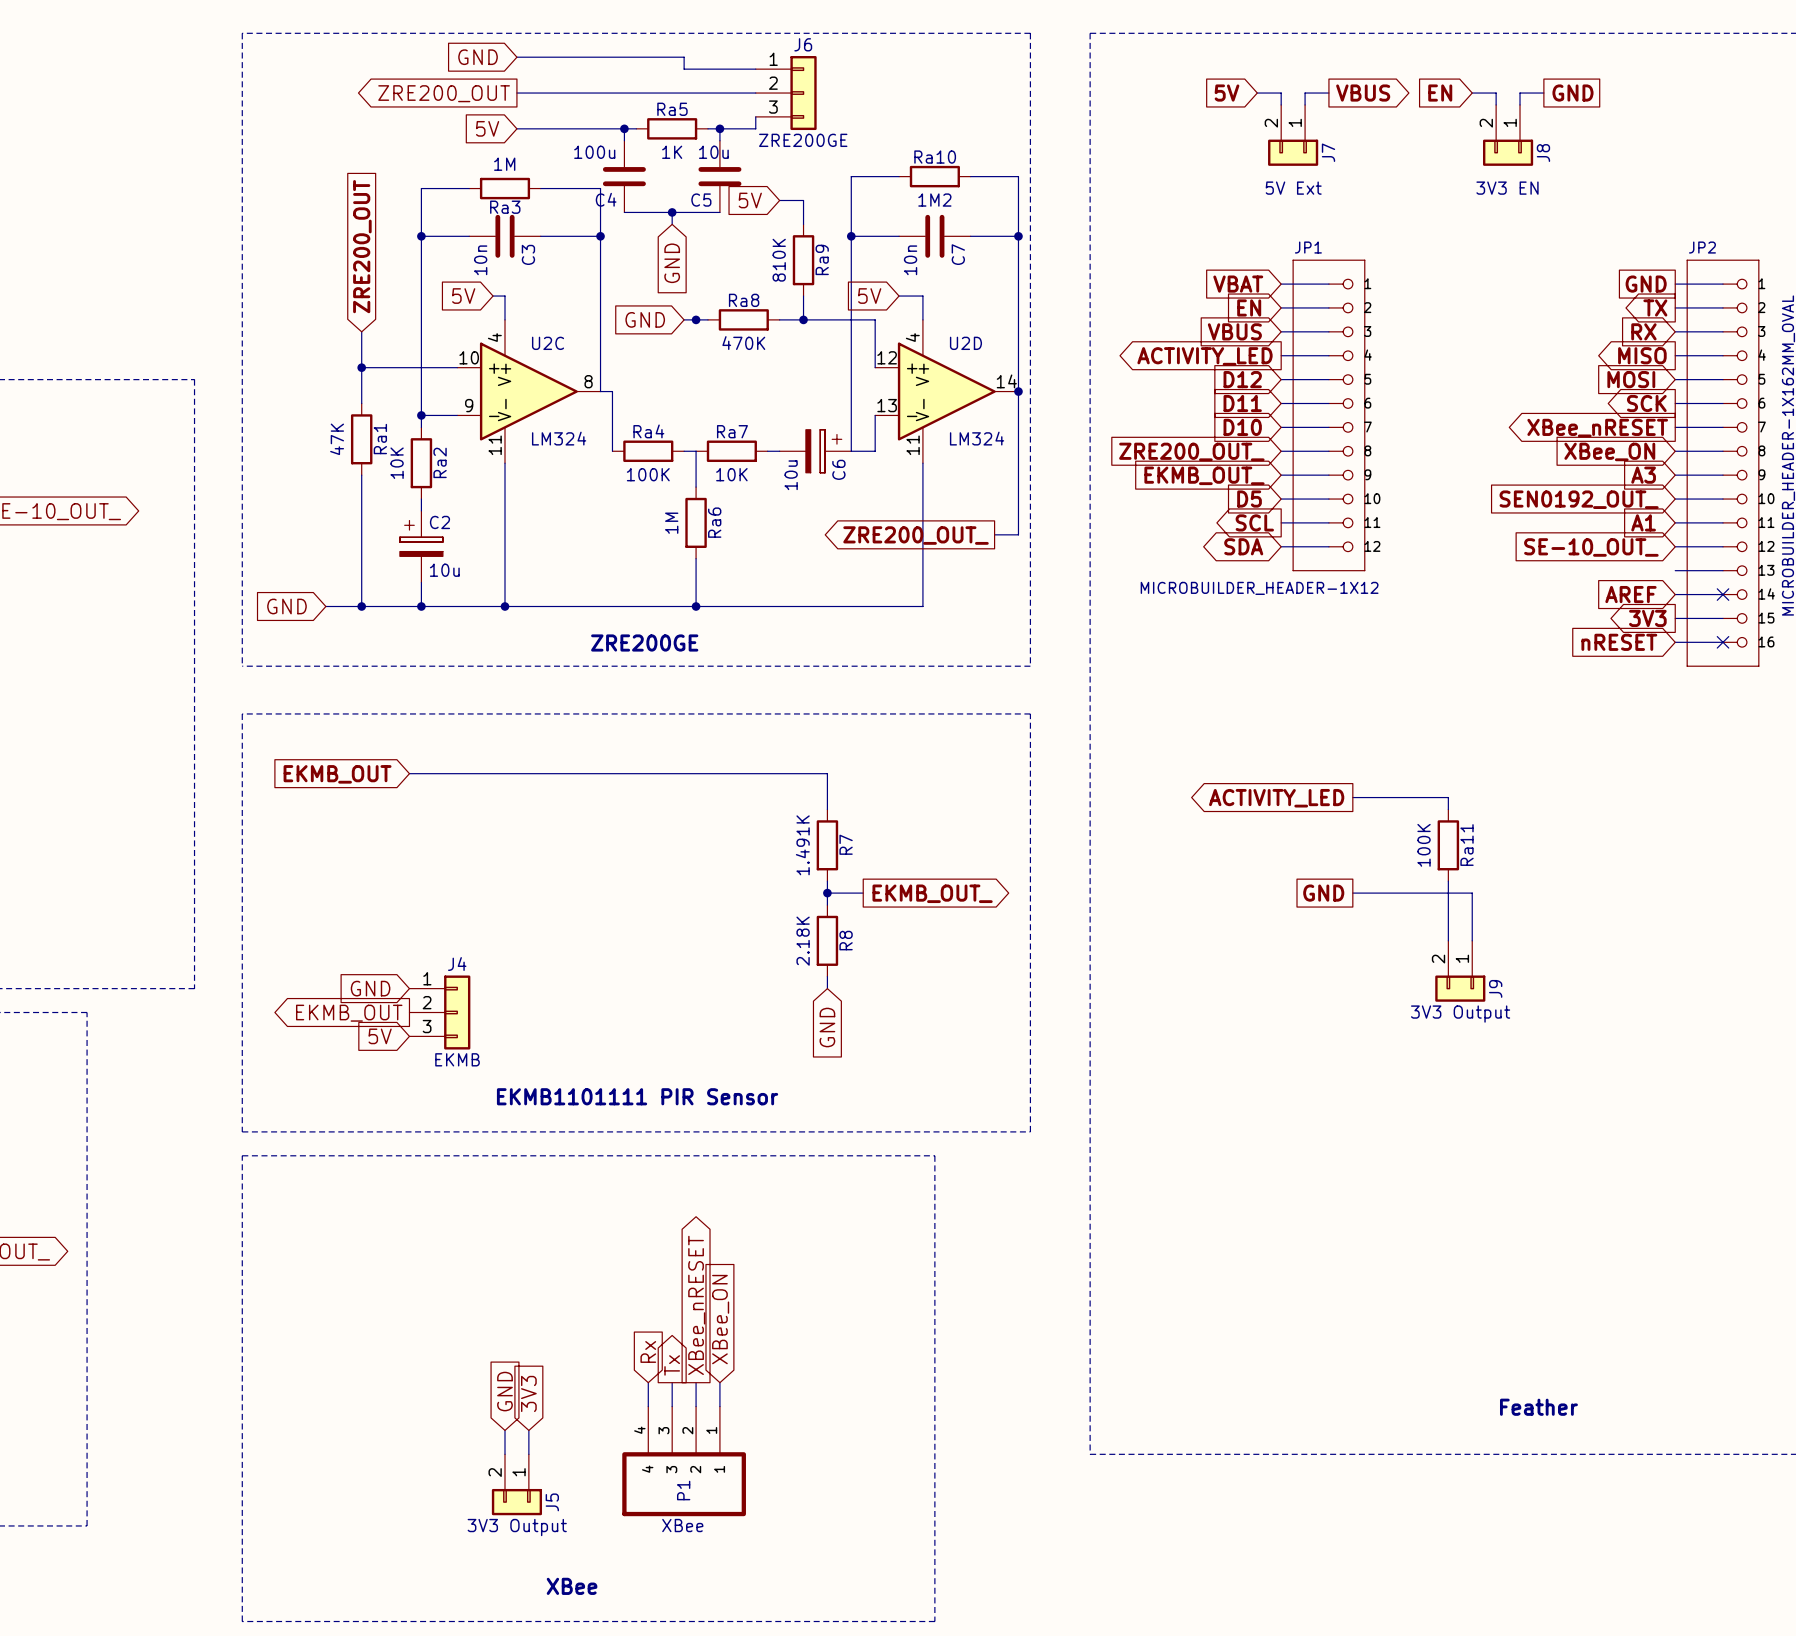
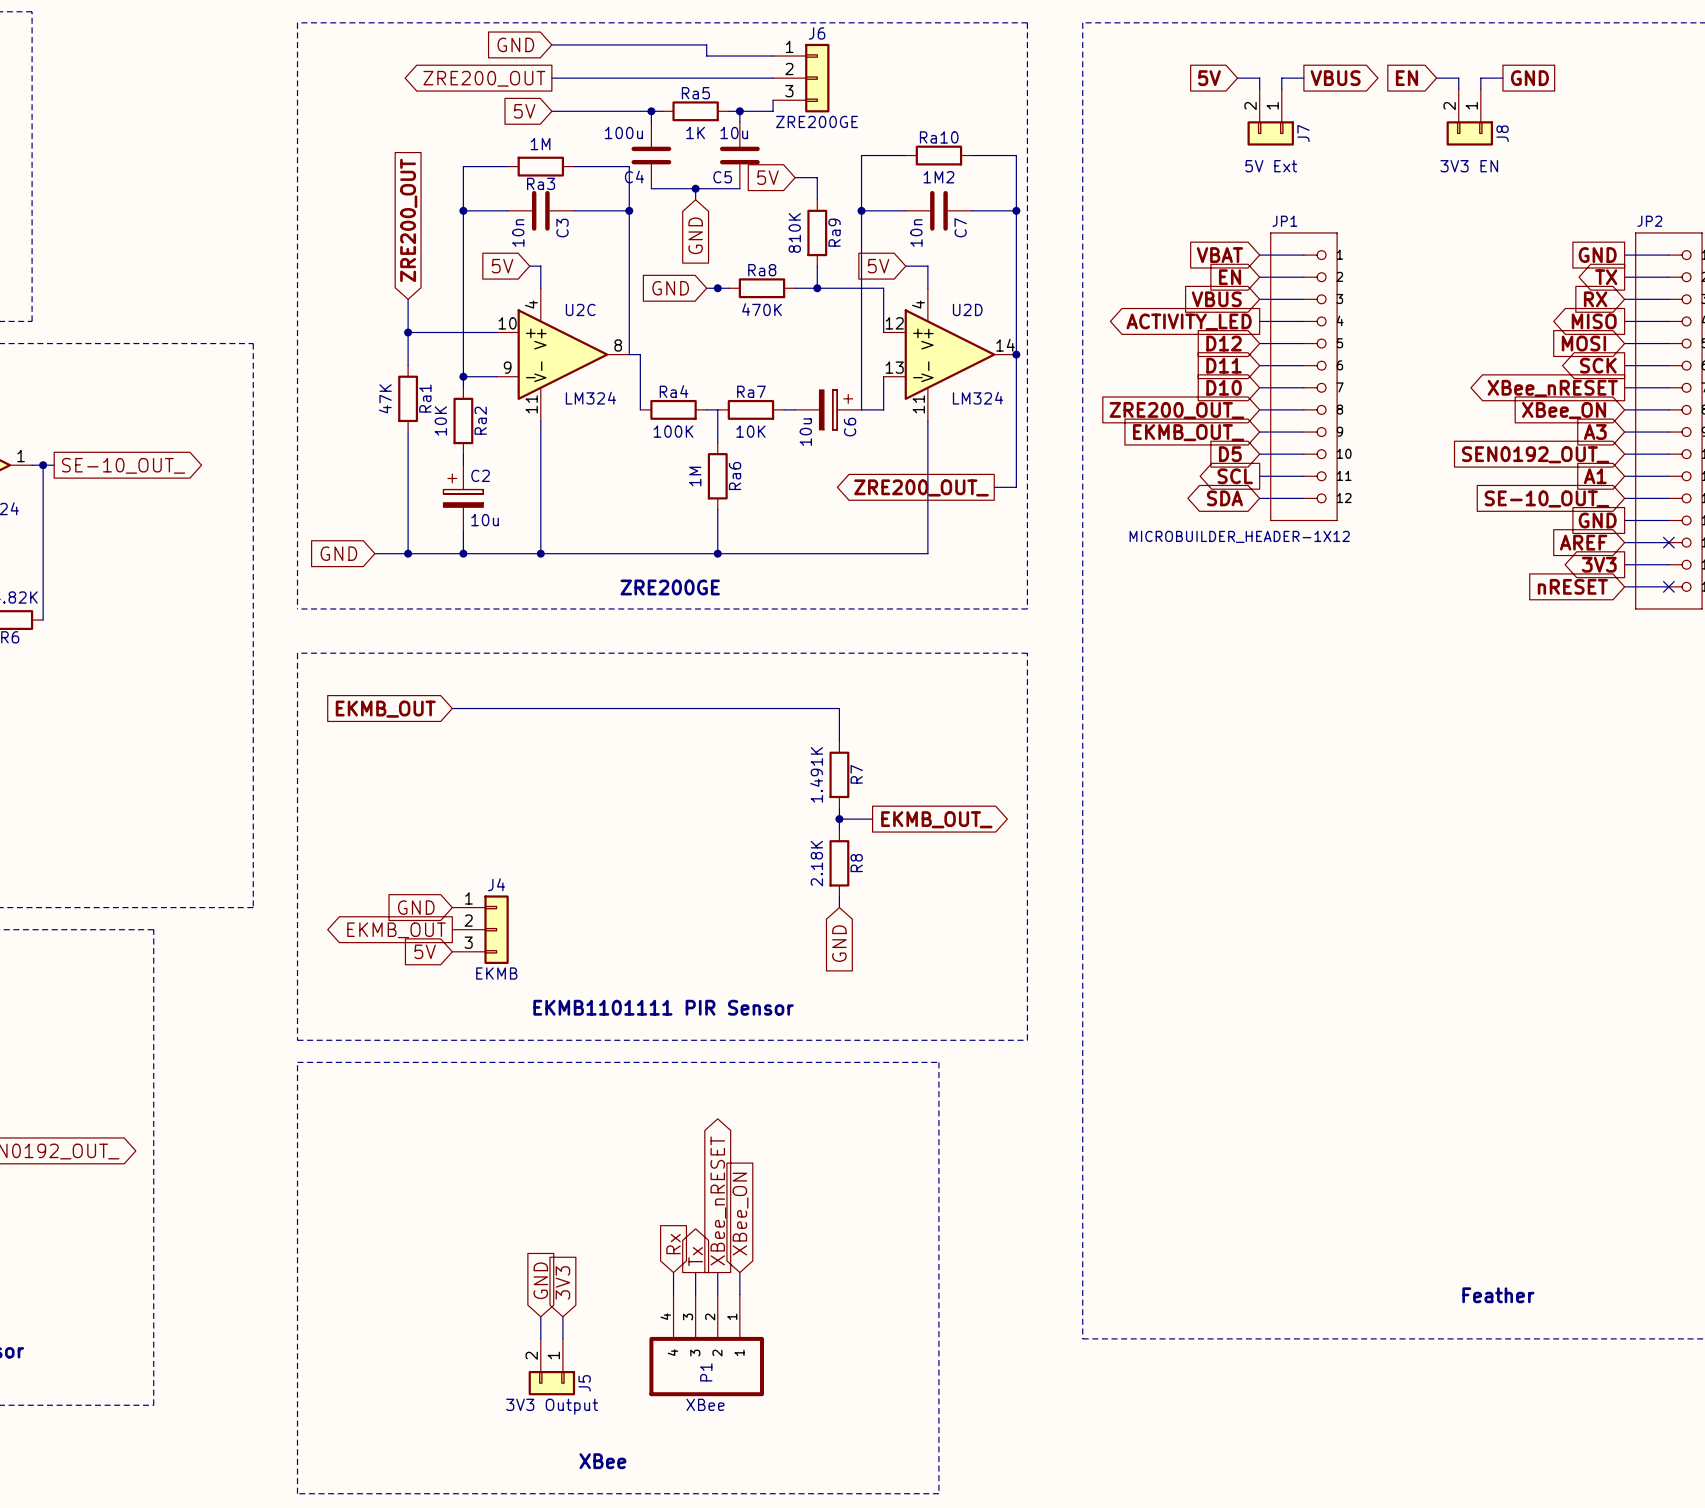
global label: none -> GND (1597, 520)
wire: (1352, 797) (1448, 797) (1448, 809) -> none
global label: ACTIVITY_LED (1276, 798) -> none
Ra11: 100K (1448, 845) -> none
wire: (1448, 881) (1448, 940) -> none
global label: GND (1323, 893) -> none
wire: (1352, 893) (1472, 893) (1472, 940) -> none
J9: 3V3 Output (1460, 971) -> none

